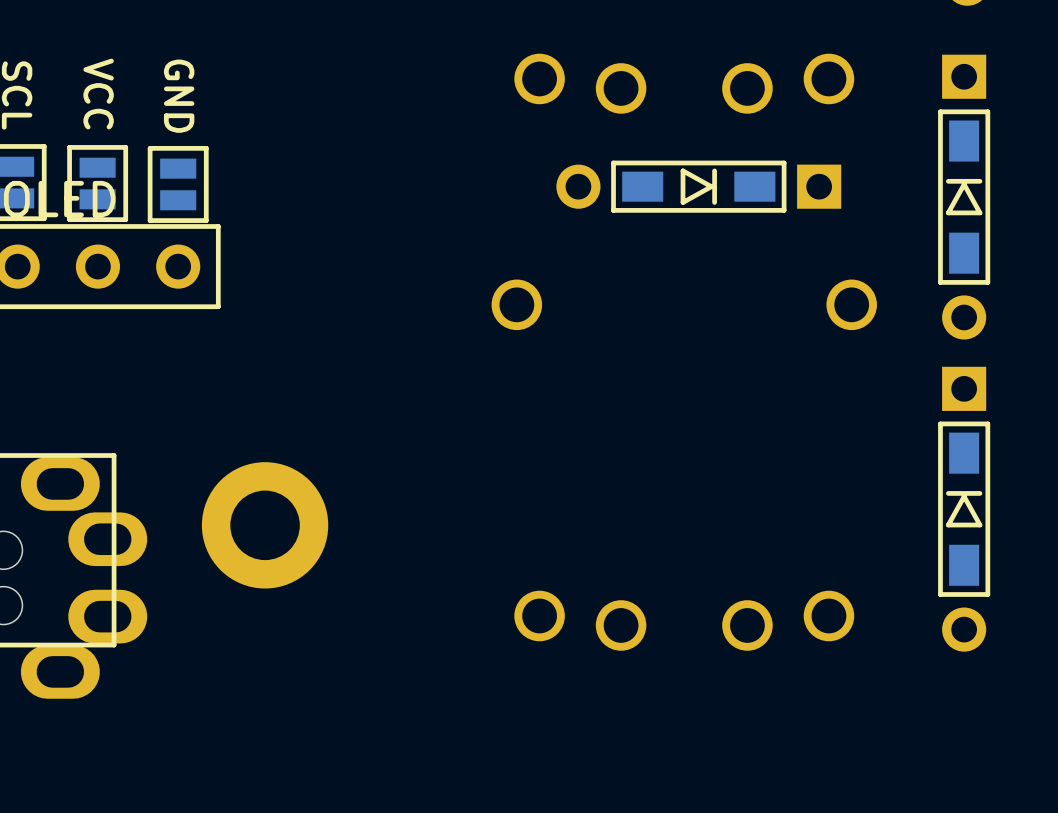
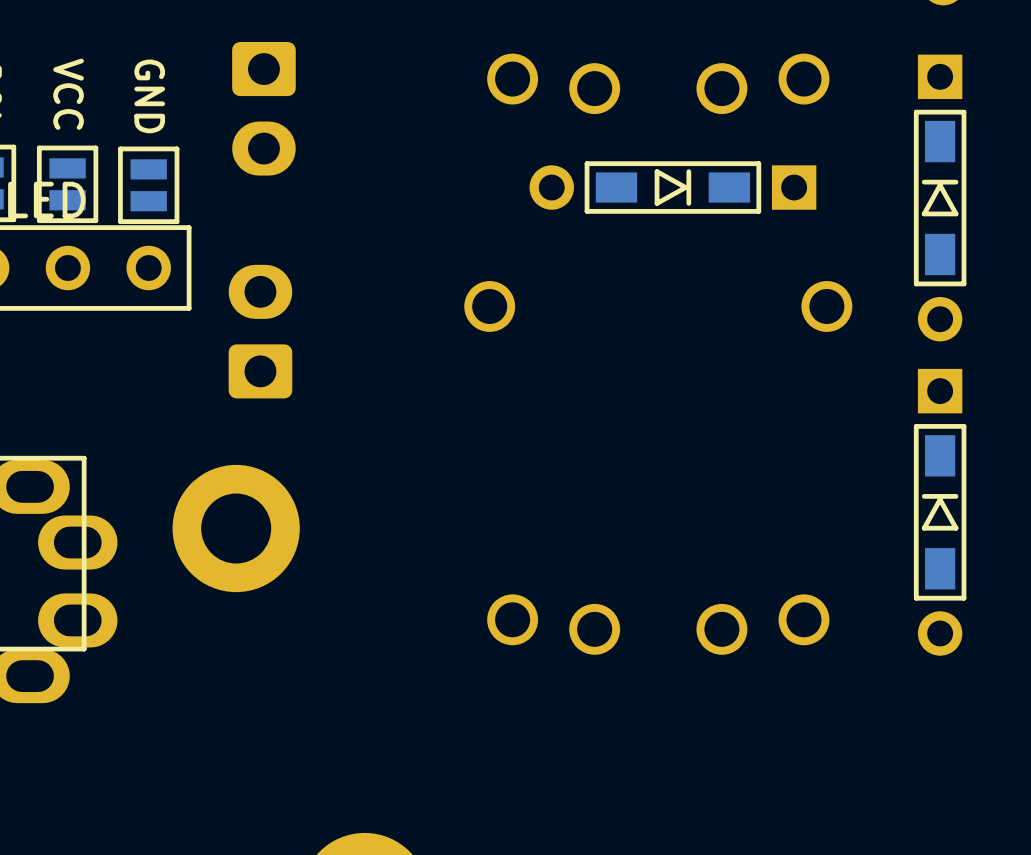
part: none -> (263, 108)
part: none -> (260, 331)

